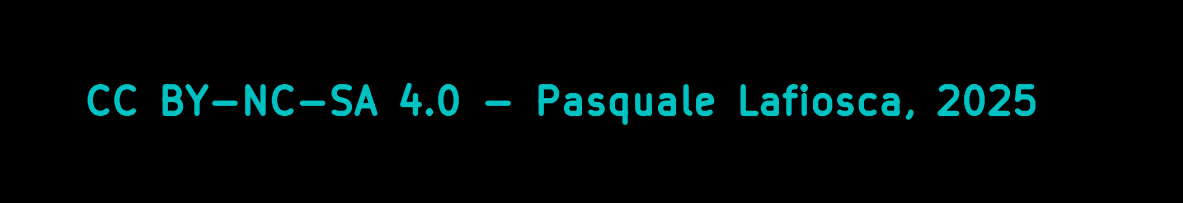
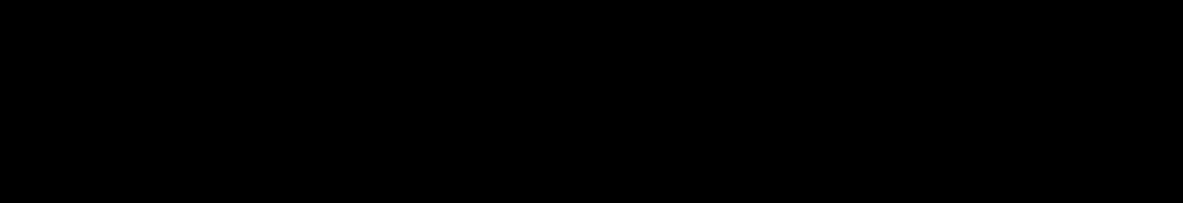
text: CC BY-NC-SA 4.0 - Pasquale Lafiosca, 2025 (561, 103) -> none

